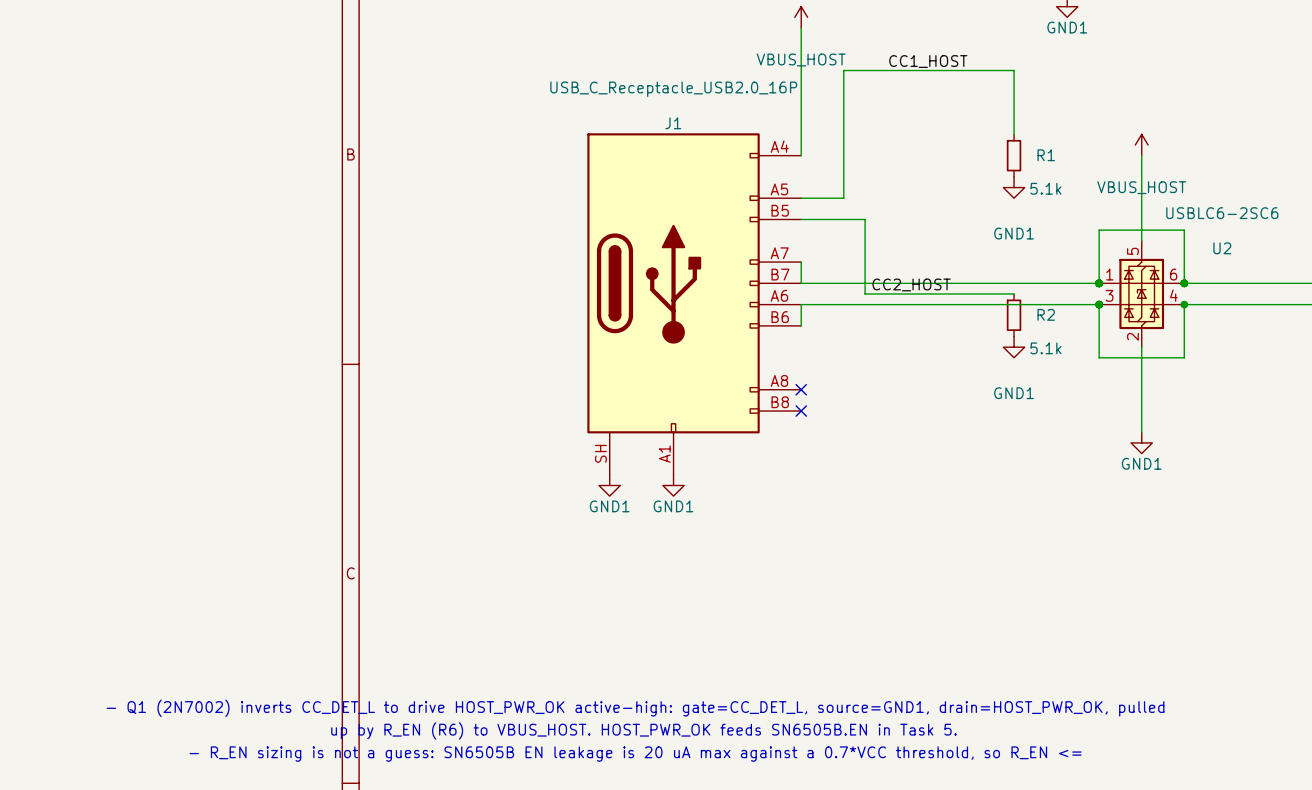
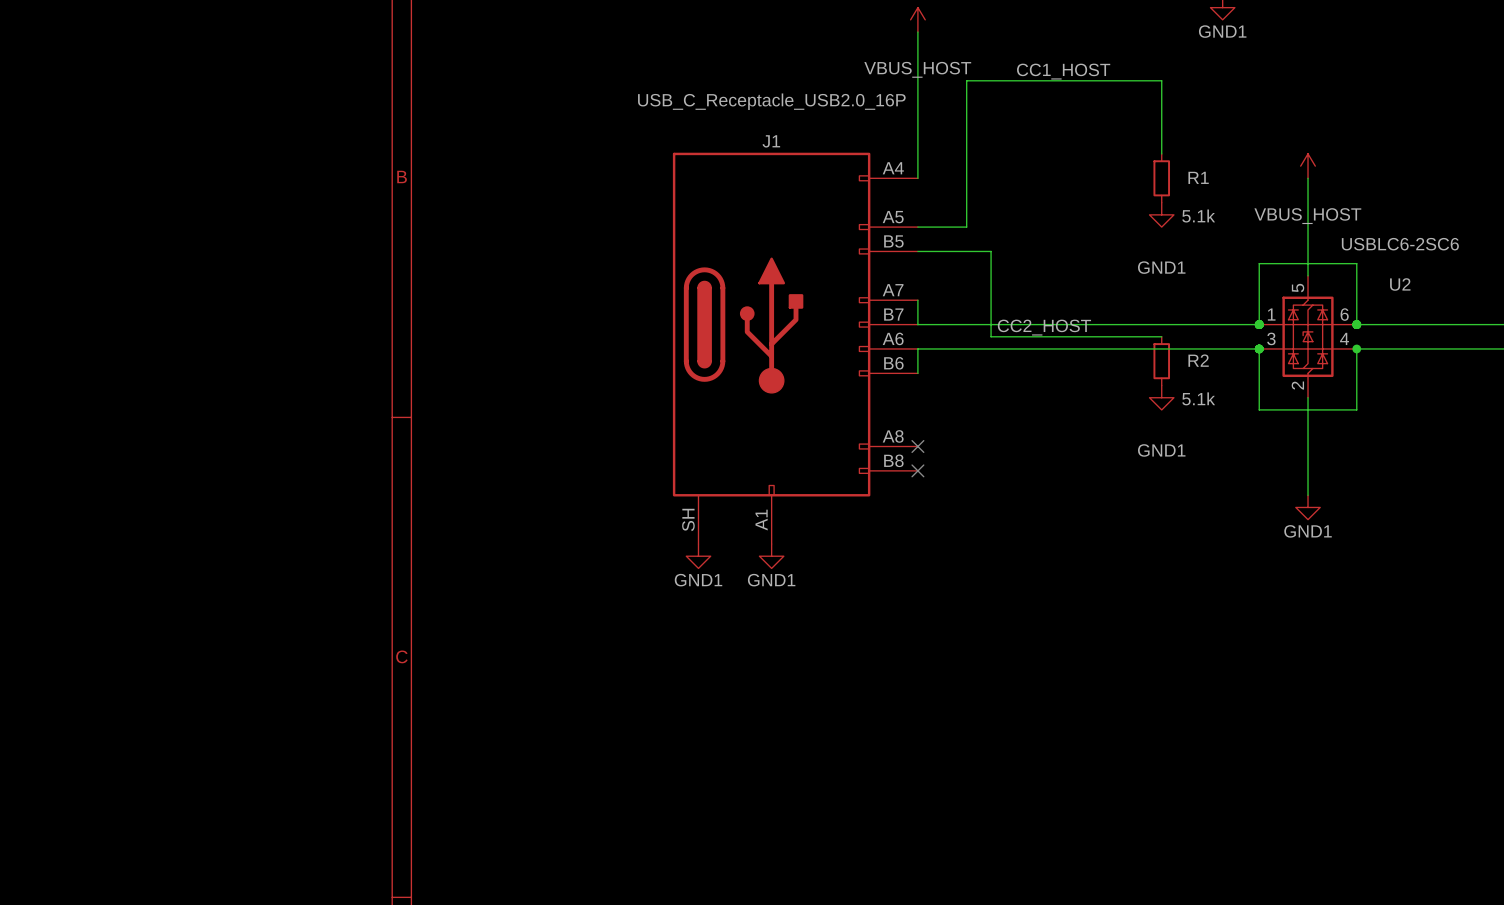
text: - Q1 (2N7002) inverts CC_DET_L to drive HOST_PWR_OK active-high: gate=CC_DET_L, source=GND1, drain=HOST_PWR_OK, pulled (635, 708) -> none
text: up by R_EN (R6) to VBUS_HOST. HOST_PWR_OK feeds SN6505B.EN in Task 5. (643, 730) -> none
text: - R_EN sizing is not a guess: SN6505B EN leakage is 20 uA max against a 0.7*VCC threshold, so R_EN <= (635, 754) -> none

